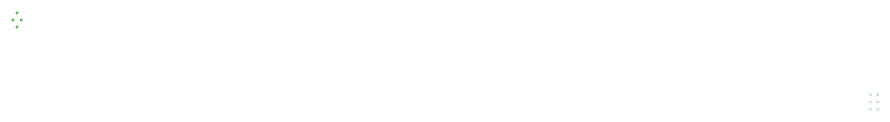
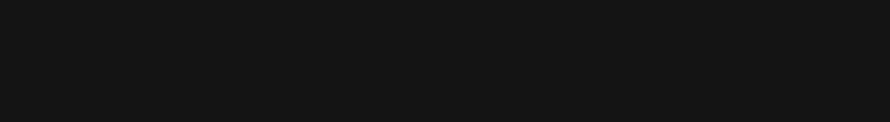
part: (17, 19) -> none
part: (874, 101) -> none

